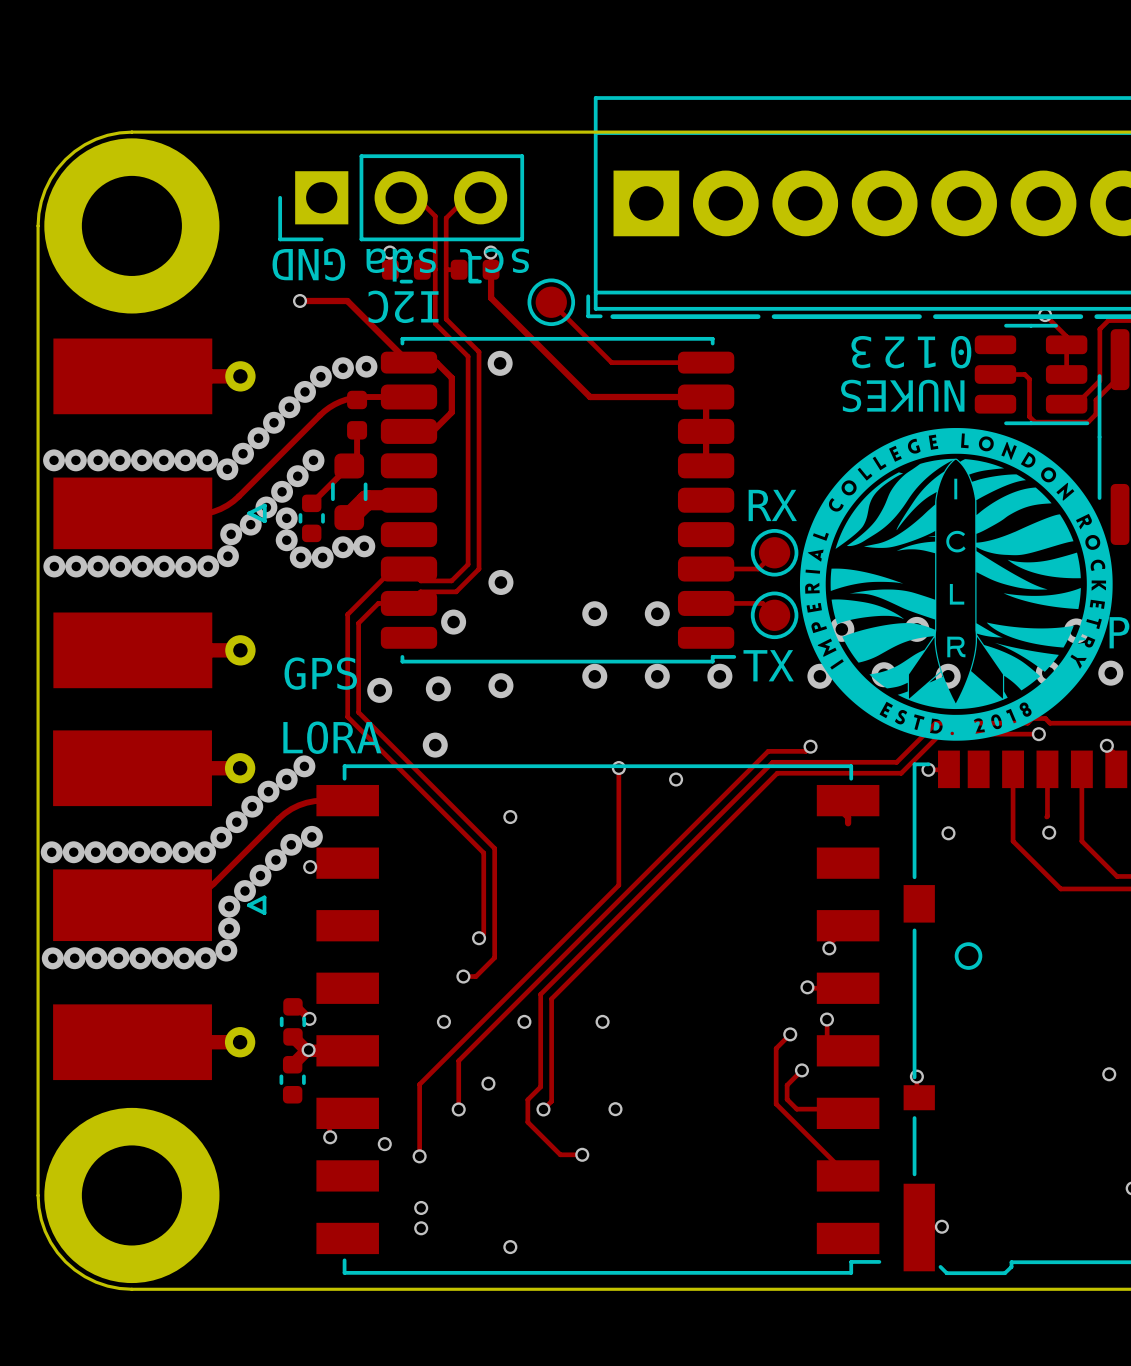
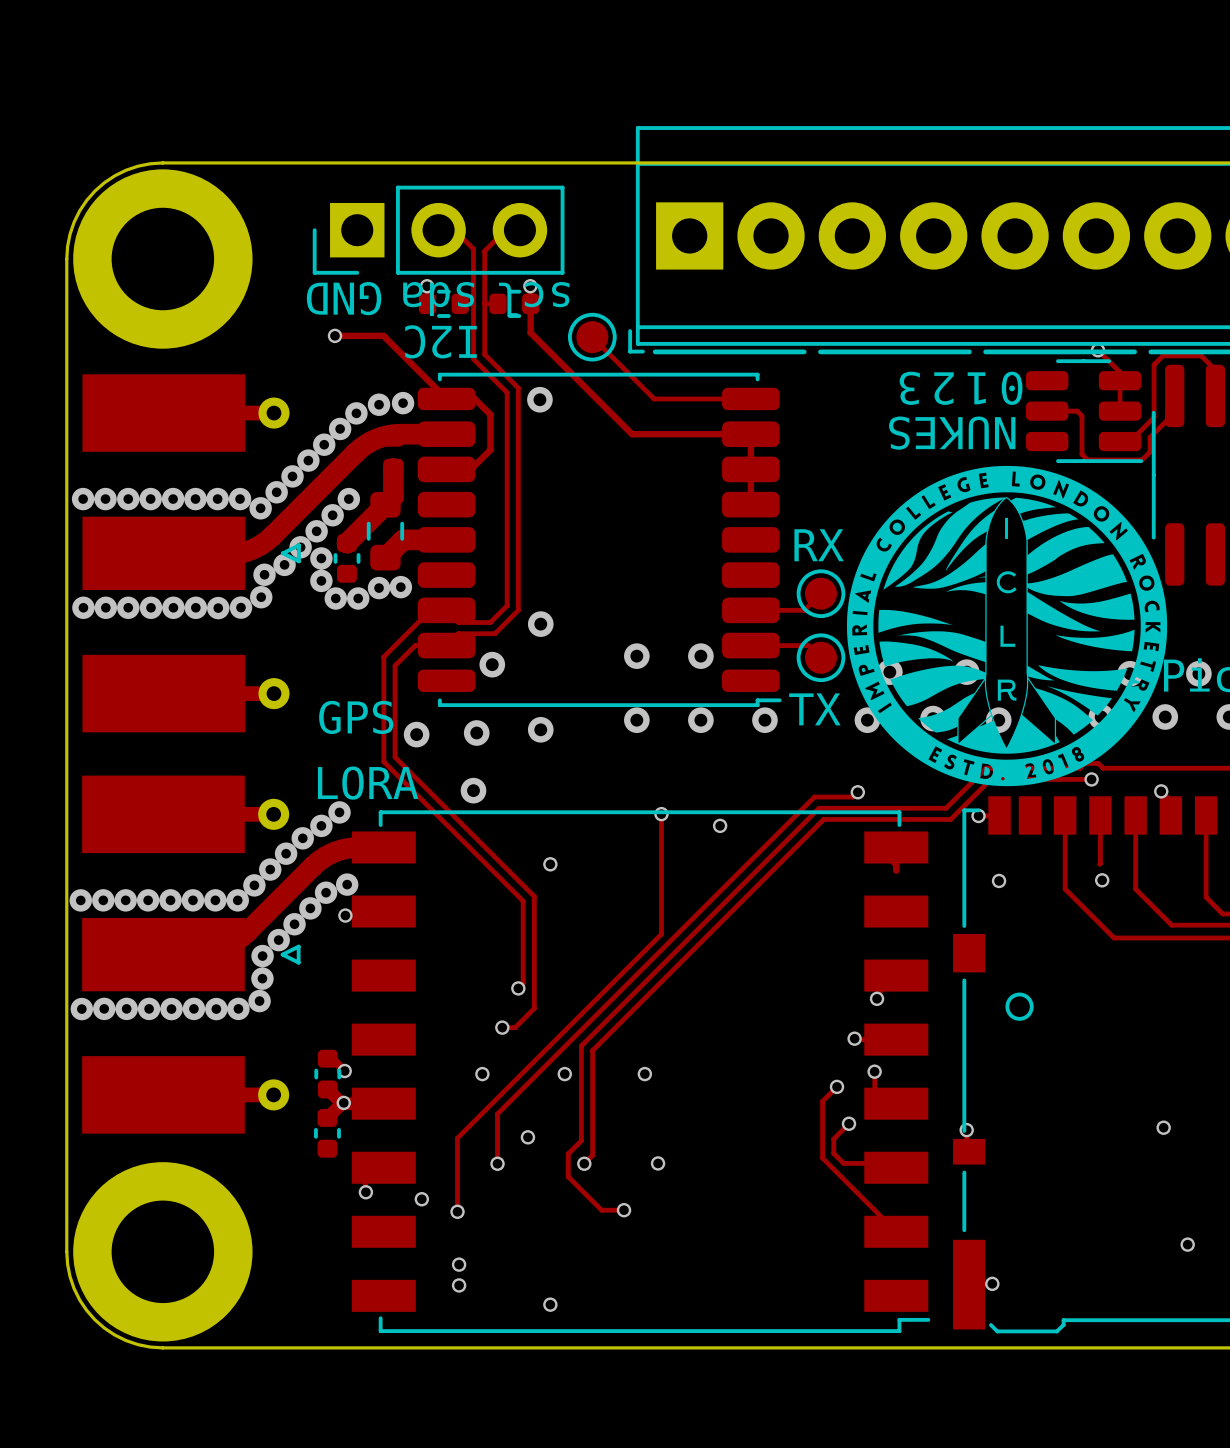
track width: thin (408, 397) (358, 397) (334, 404) (319, 415) (233, 501) (213, 511) (198, 514) -> thick (446, 434) (394, 434) (370, 441) (355, 452) (266, 540) (246, 551) (231, 554)
track width: thin (357, 430) (357, 458) (311, 503) -> thick (393, 468) (393, 496) (347, 543)
track width: thin (347, 800) (314, 801) (291, 808) (278, 818) (208, 888) (195, 896) (173, 902) -> thick (383, 847) (349, 848) (326, 856) (313, 866) (240, 937) (227, 945) (205, 951)

